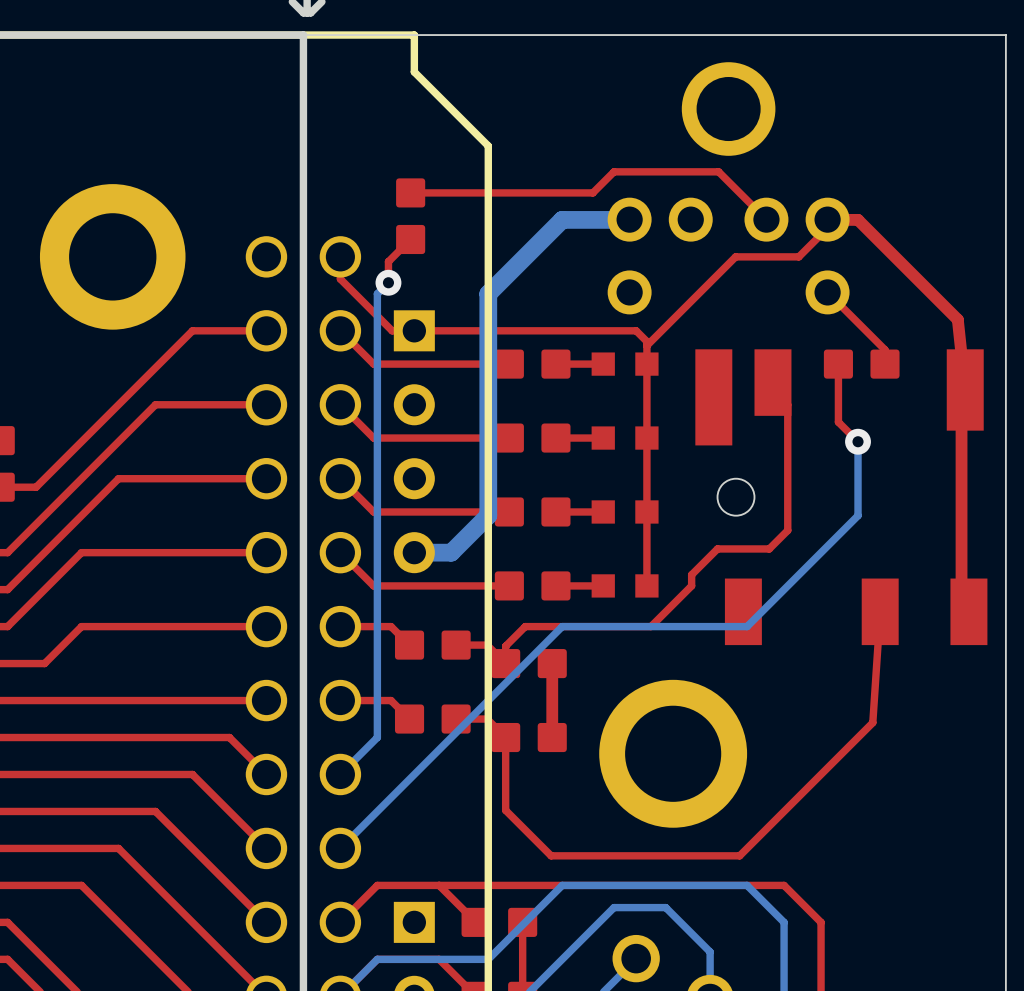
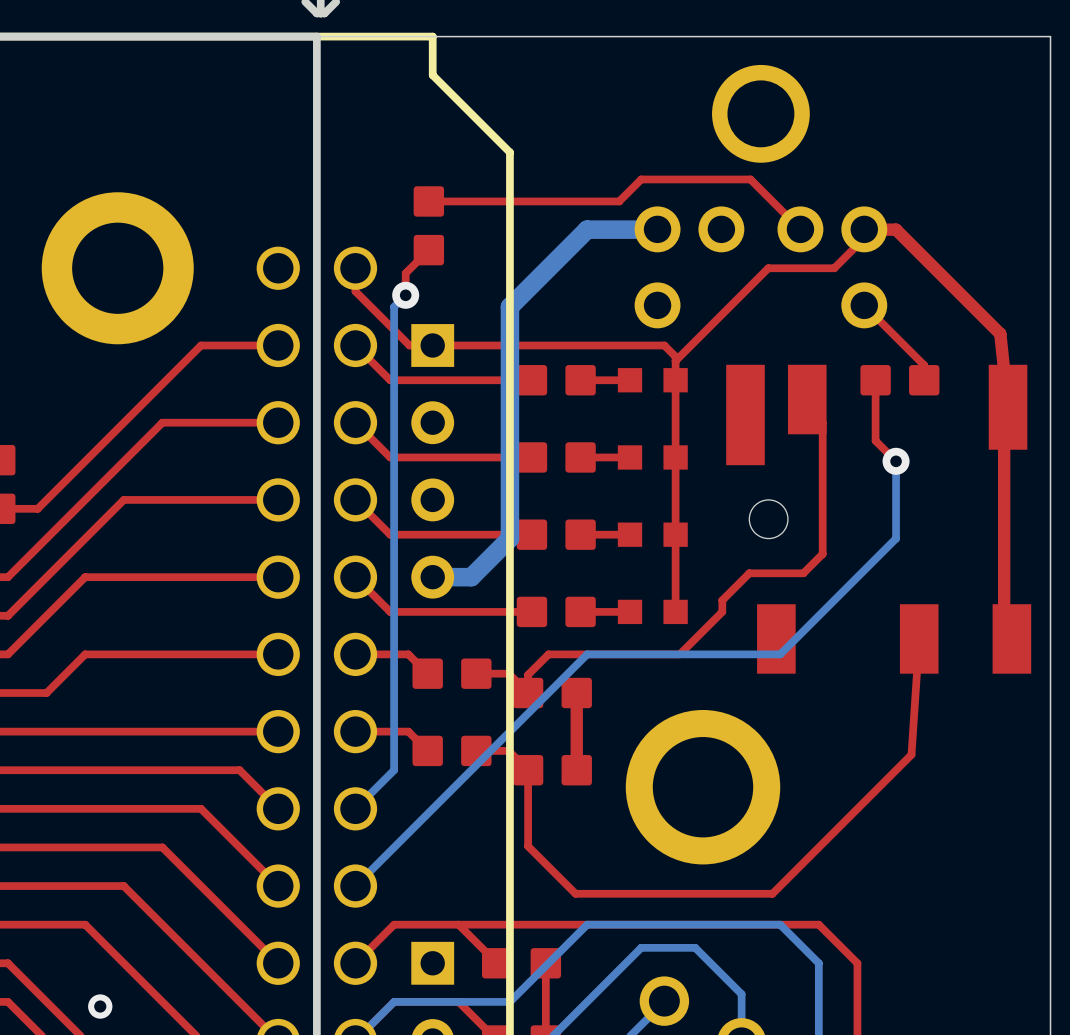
via: none -> (100, 1006)

